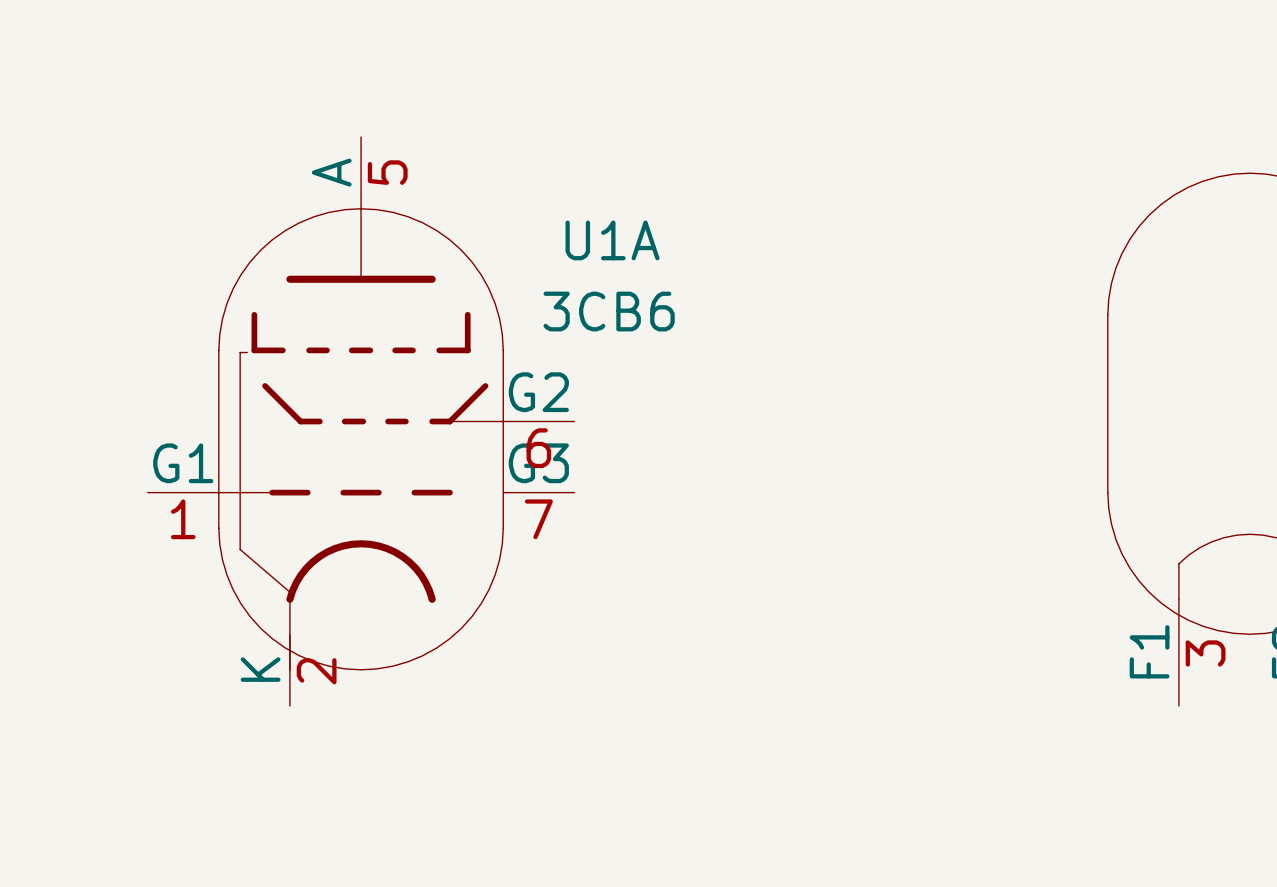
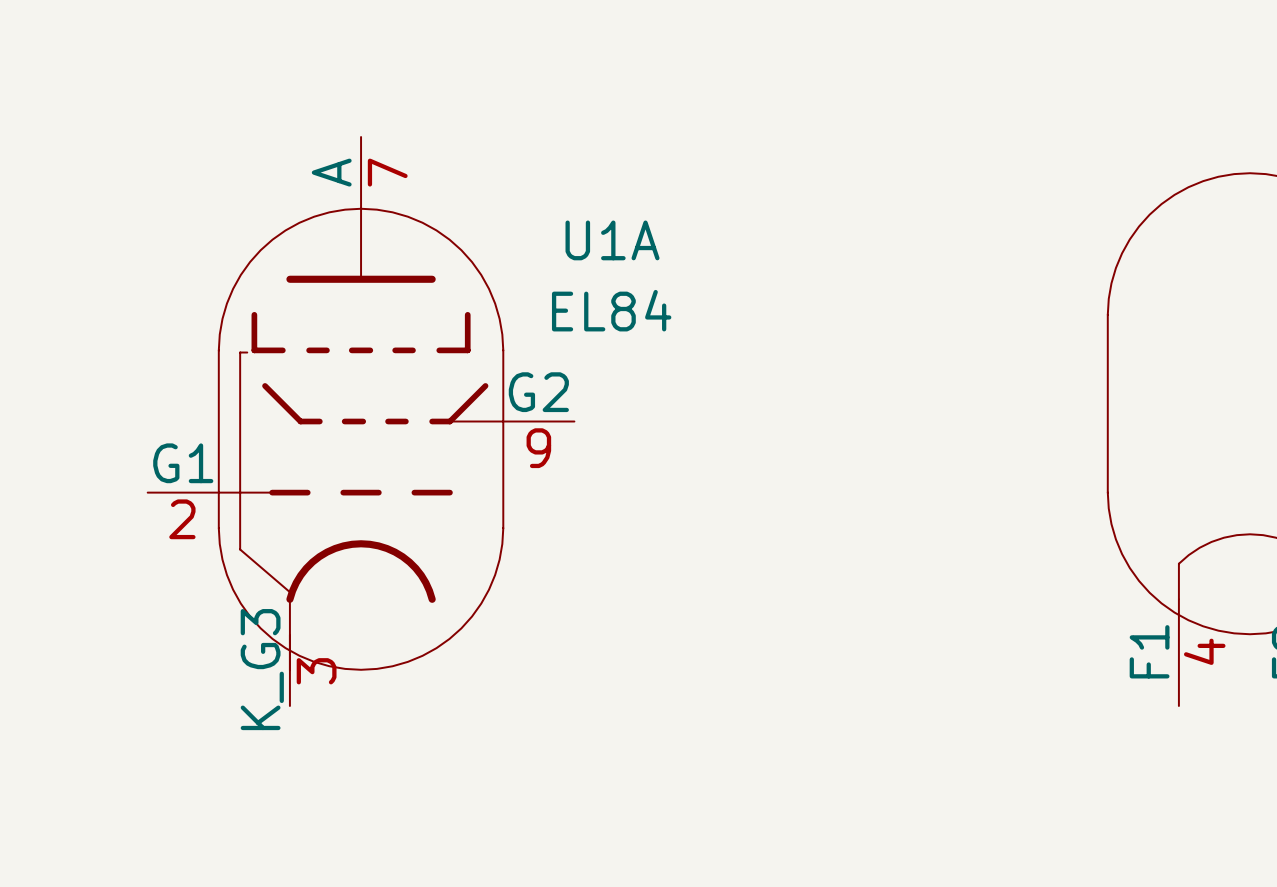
U1A symbol: [147, 137, 575, 706] -> [147, 137, 575, 706]
U1A value: 3CB6 (609, 311) -> EL84 (611, 310)
part pin number: 3 (1205, 653) -> 4 (1204, 651)

